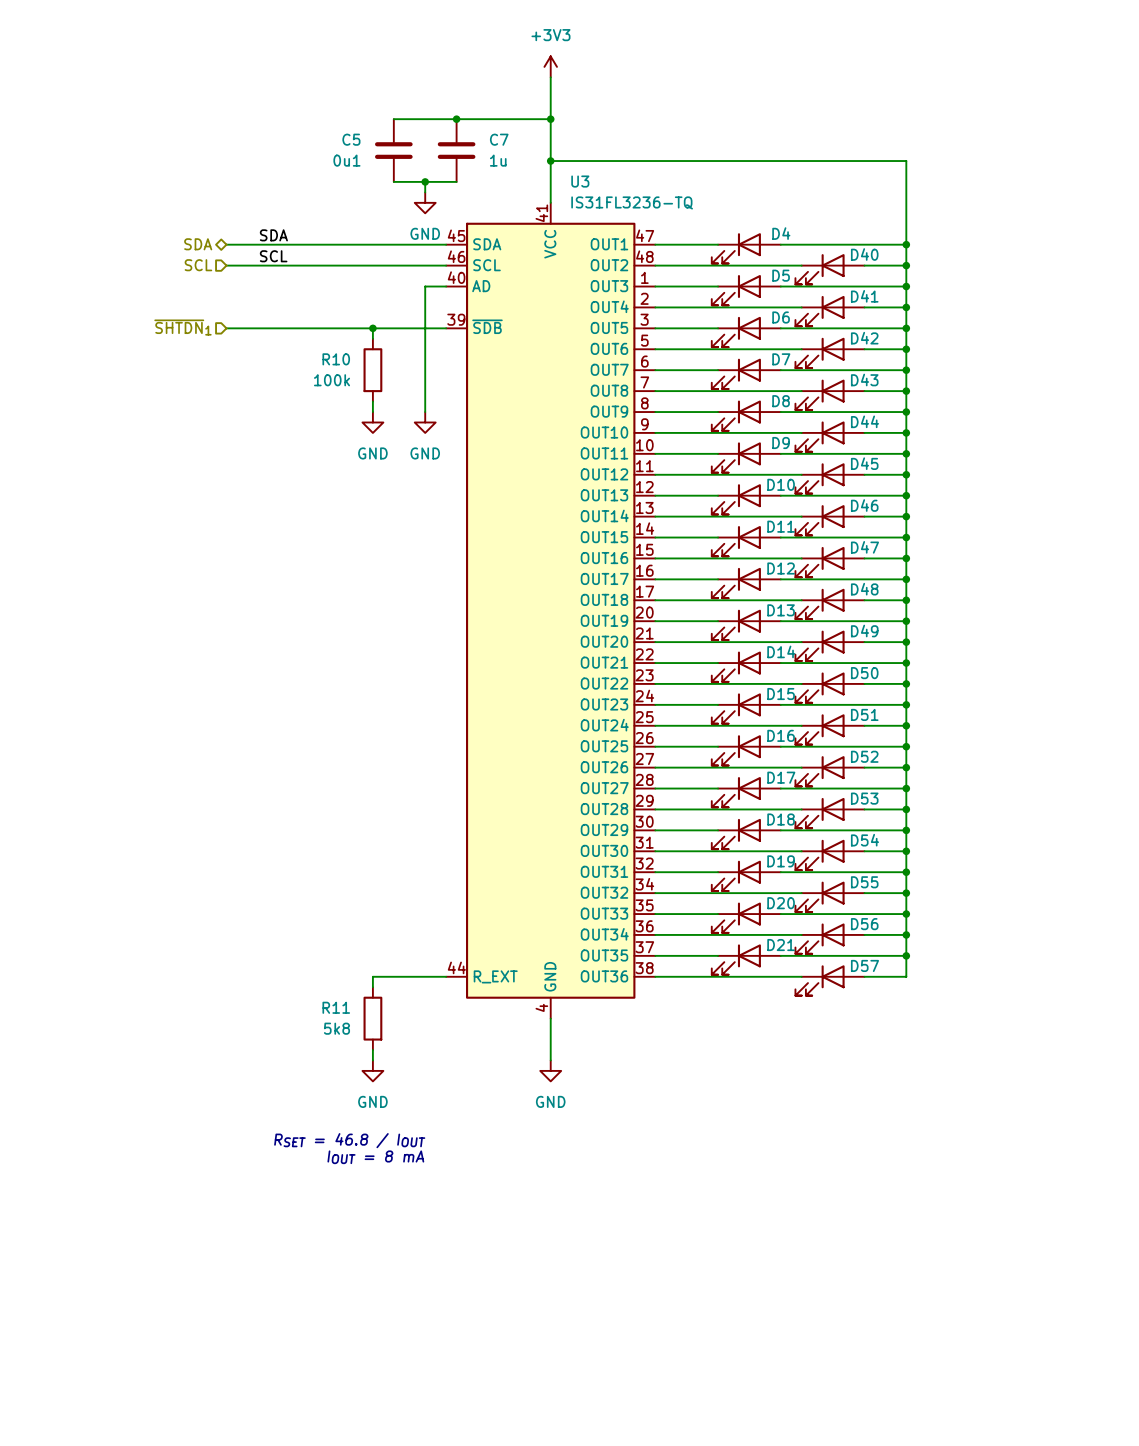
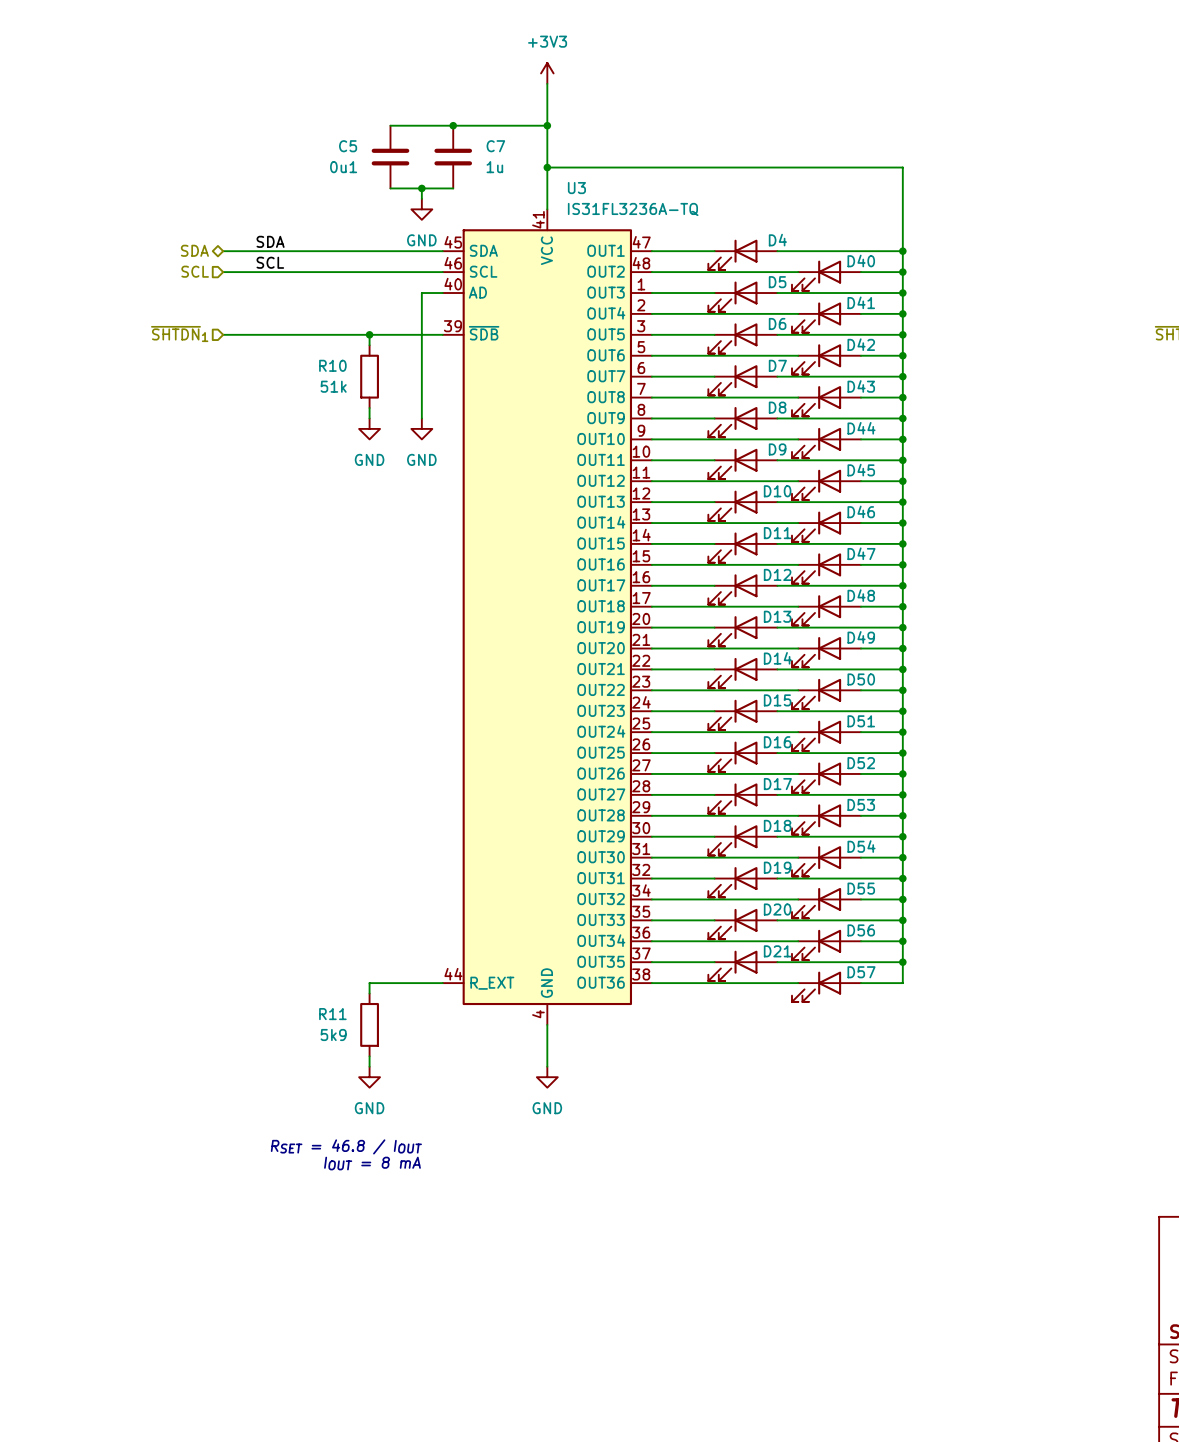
U3 value: IS31FL3236-TQ (632, 202) -> IS31FL3236A-TQ (633, 209)
R10 value: 100k (332, 380) -> 51k (333, 386)
R11 value: 5k8 (336, 1028) -> 5k9 (333, 1034)

